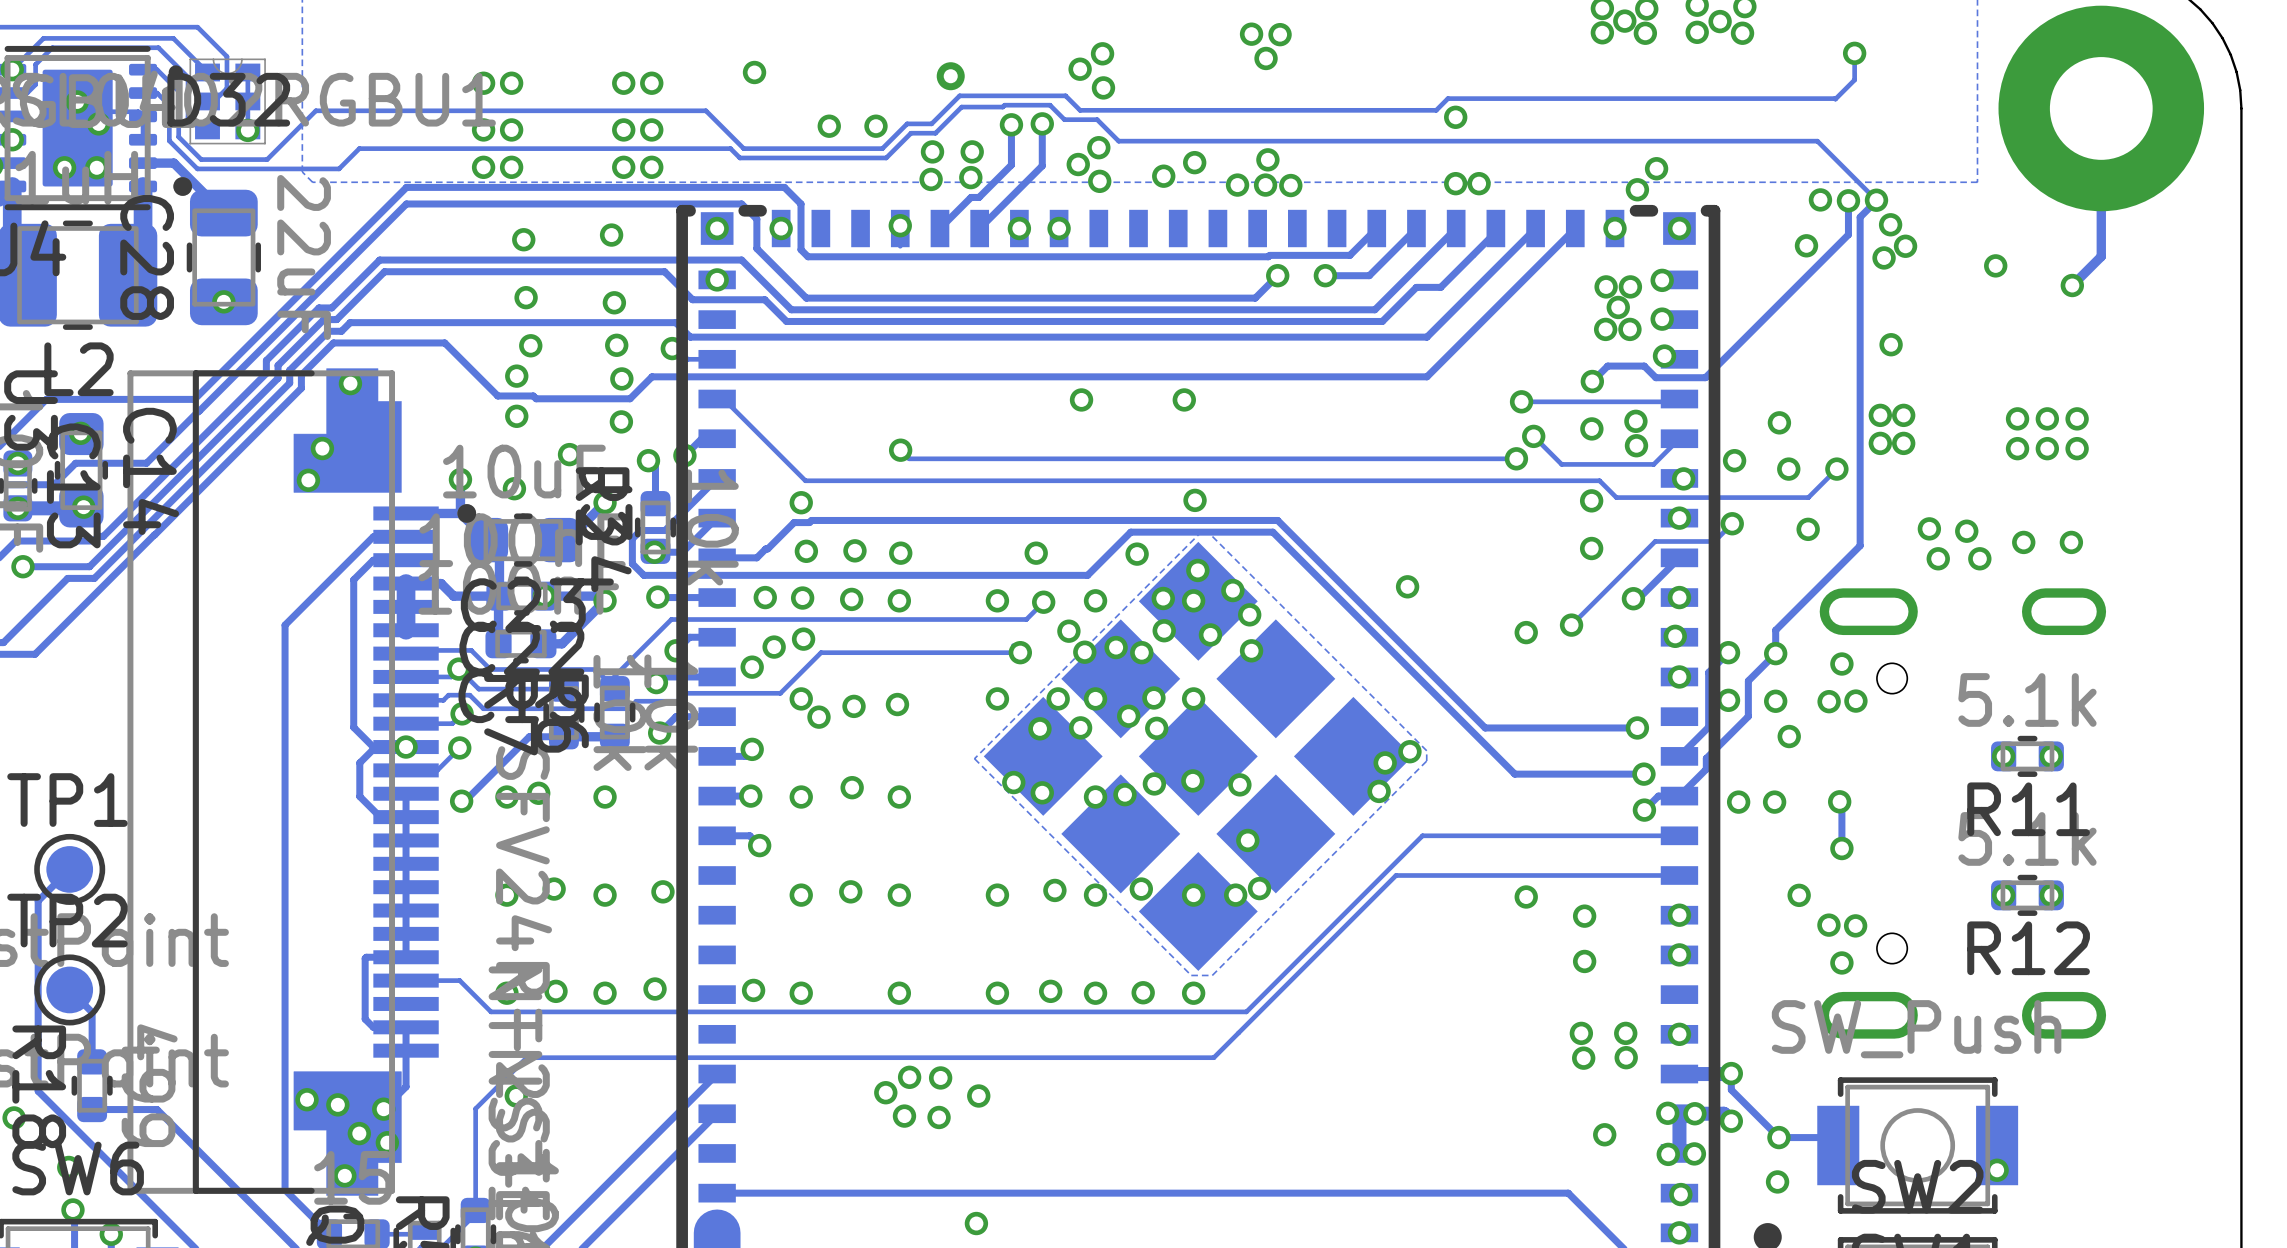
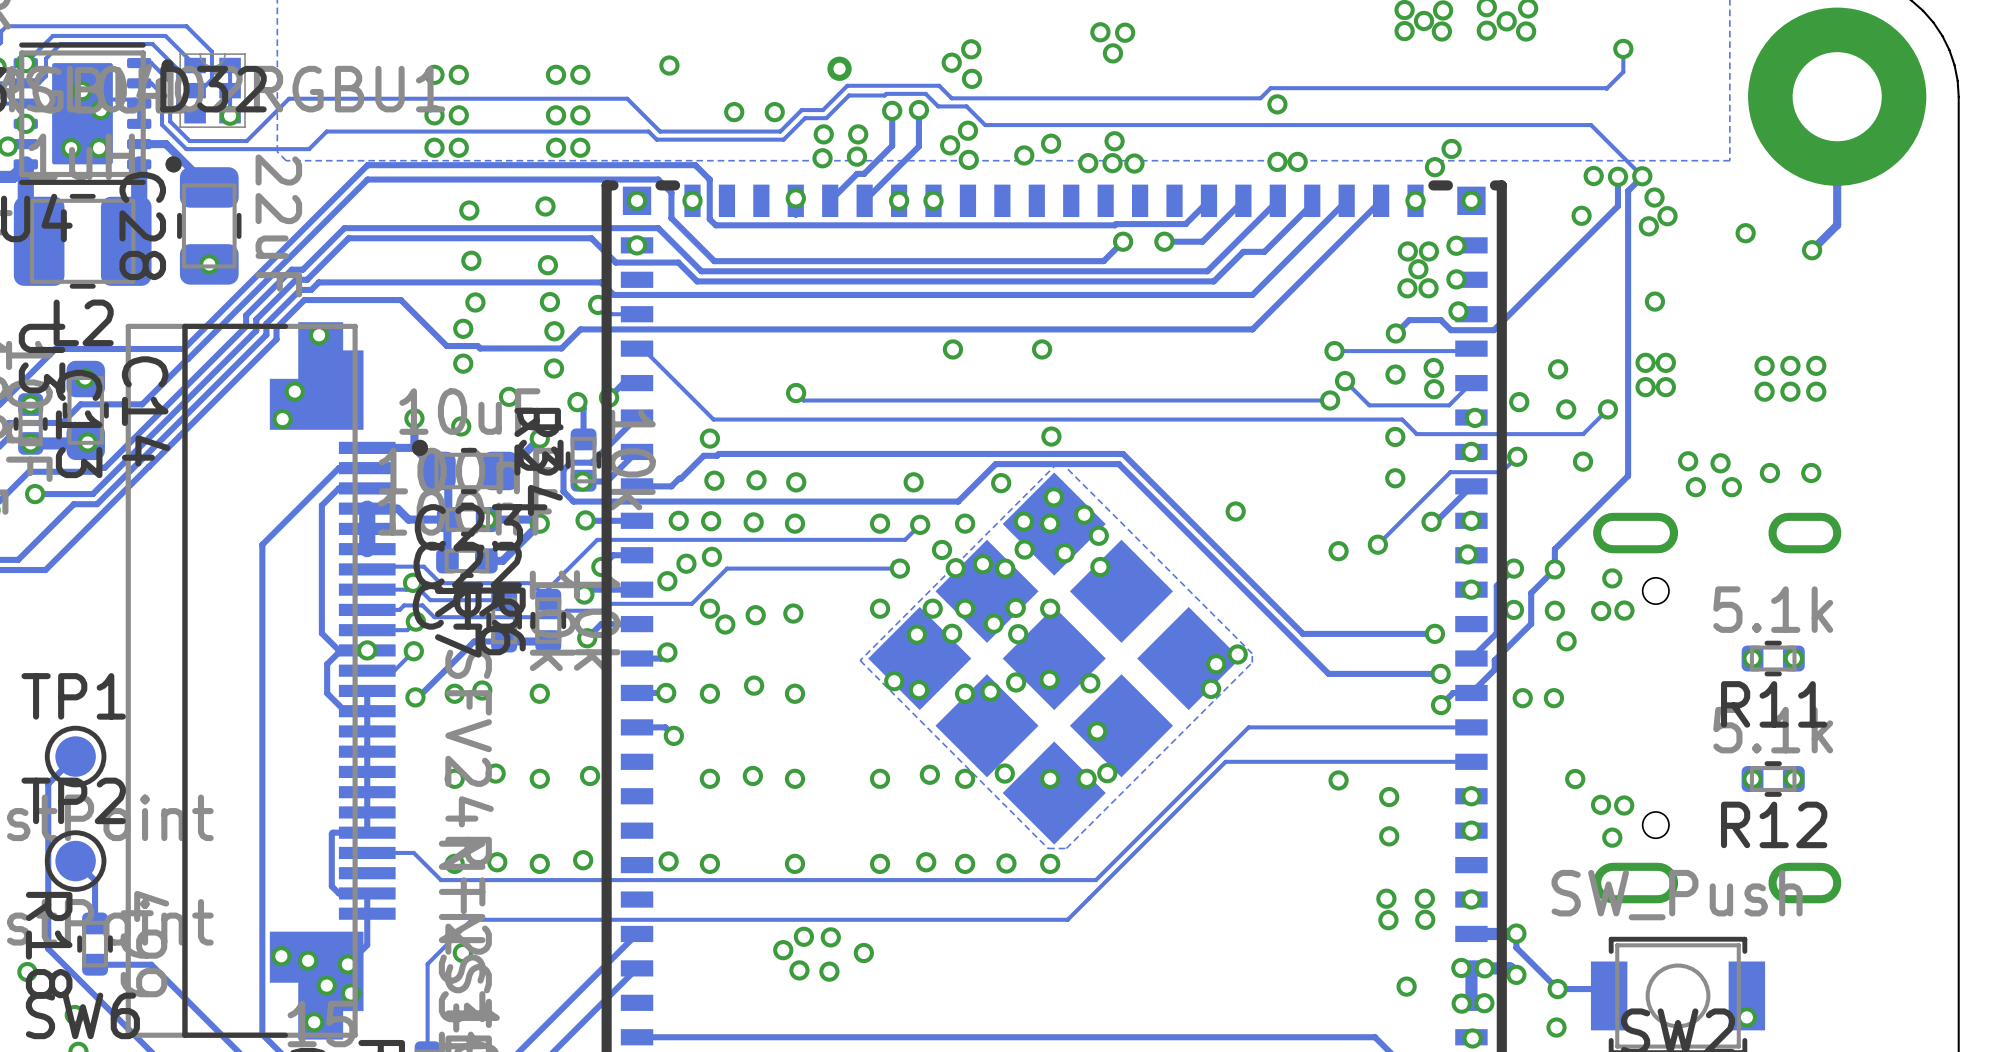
track: (1839, 801) (1841, 804) (1841, 848) -> none
via: (1839, 801) -> none
via: (1841, 848) -> none

